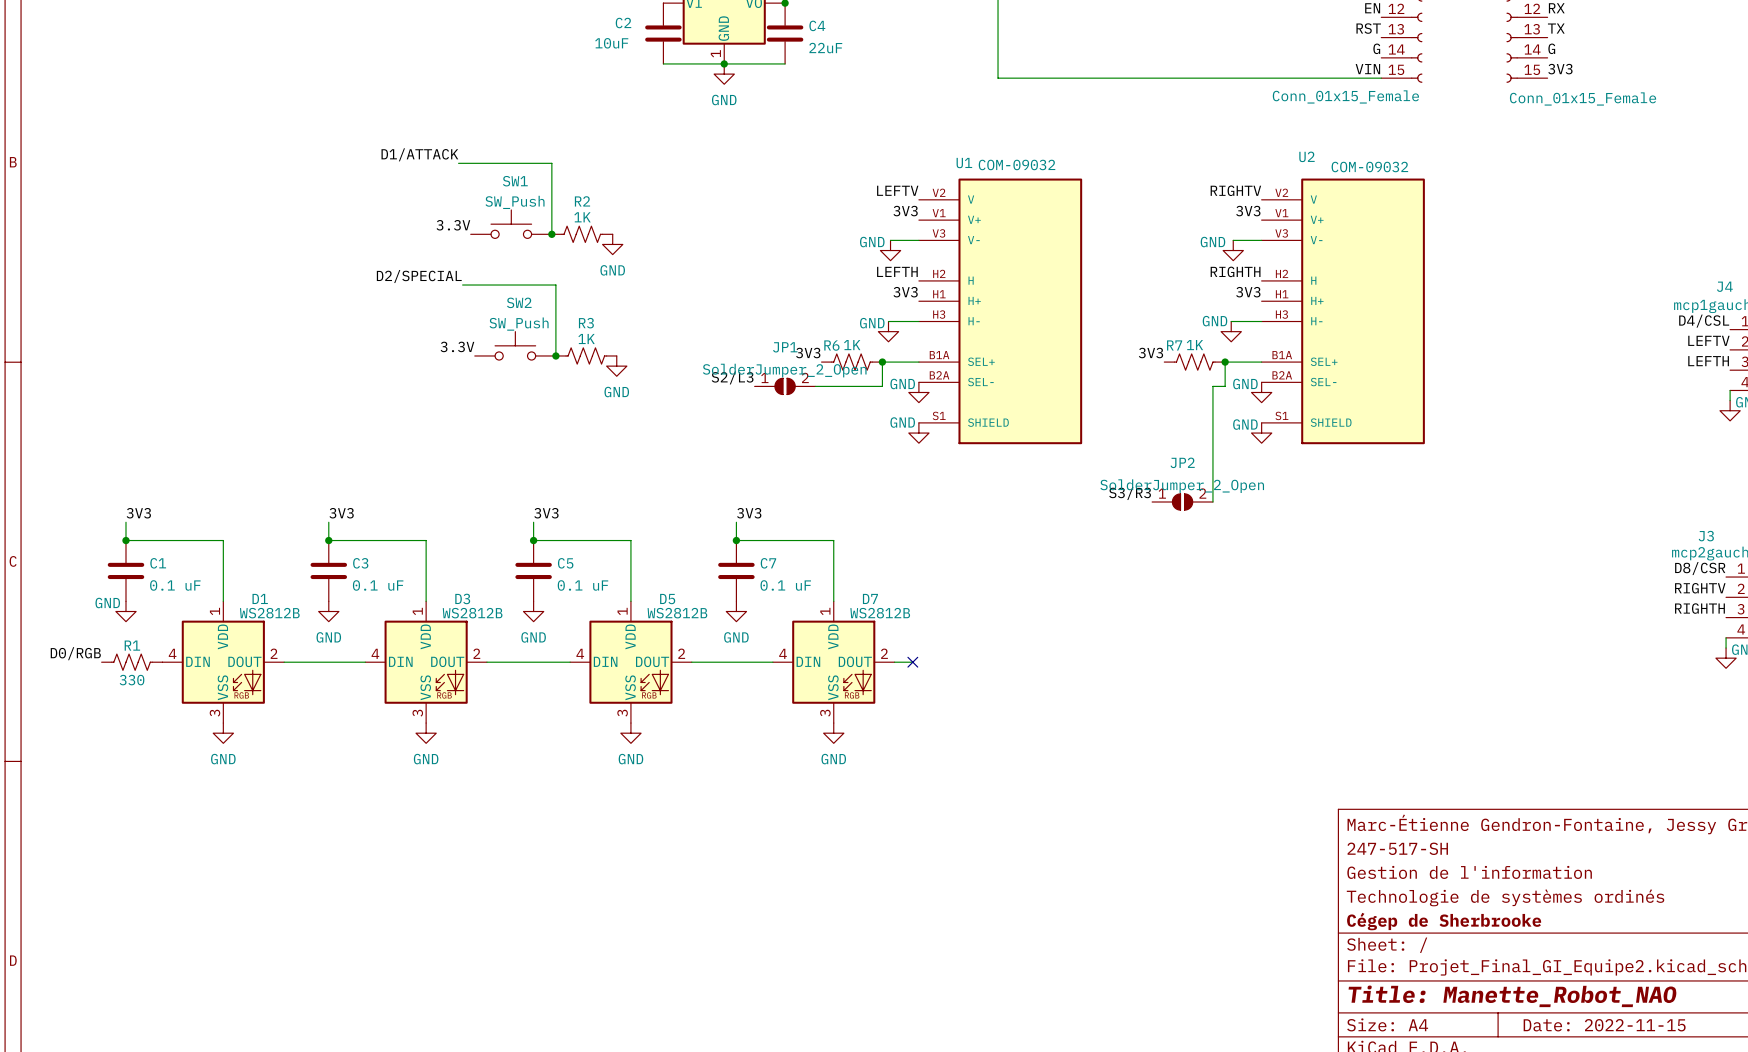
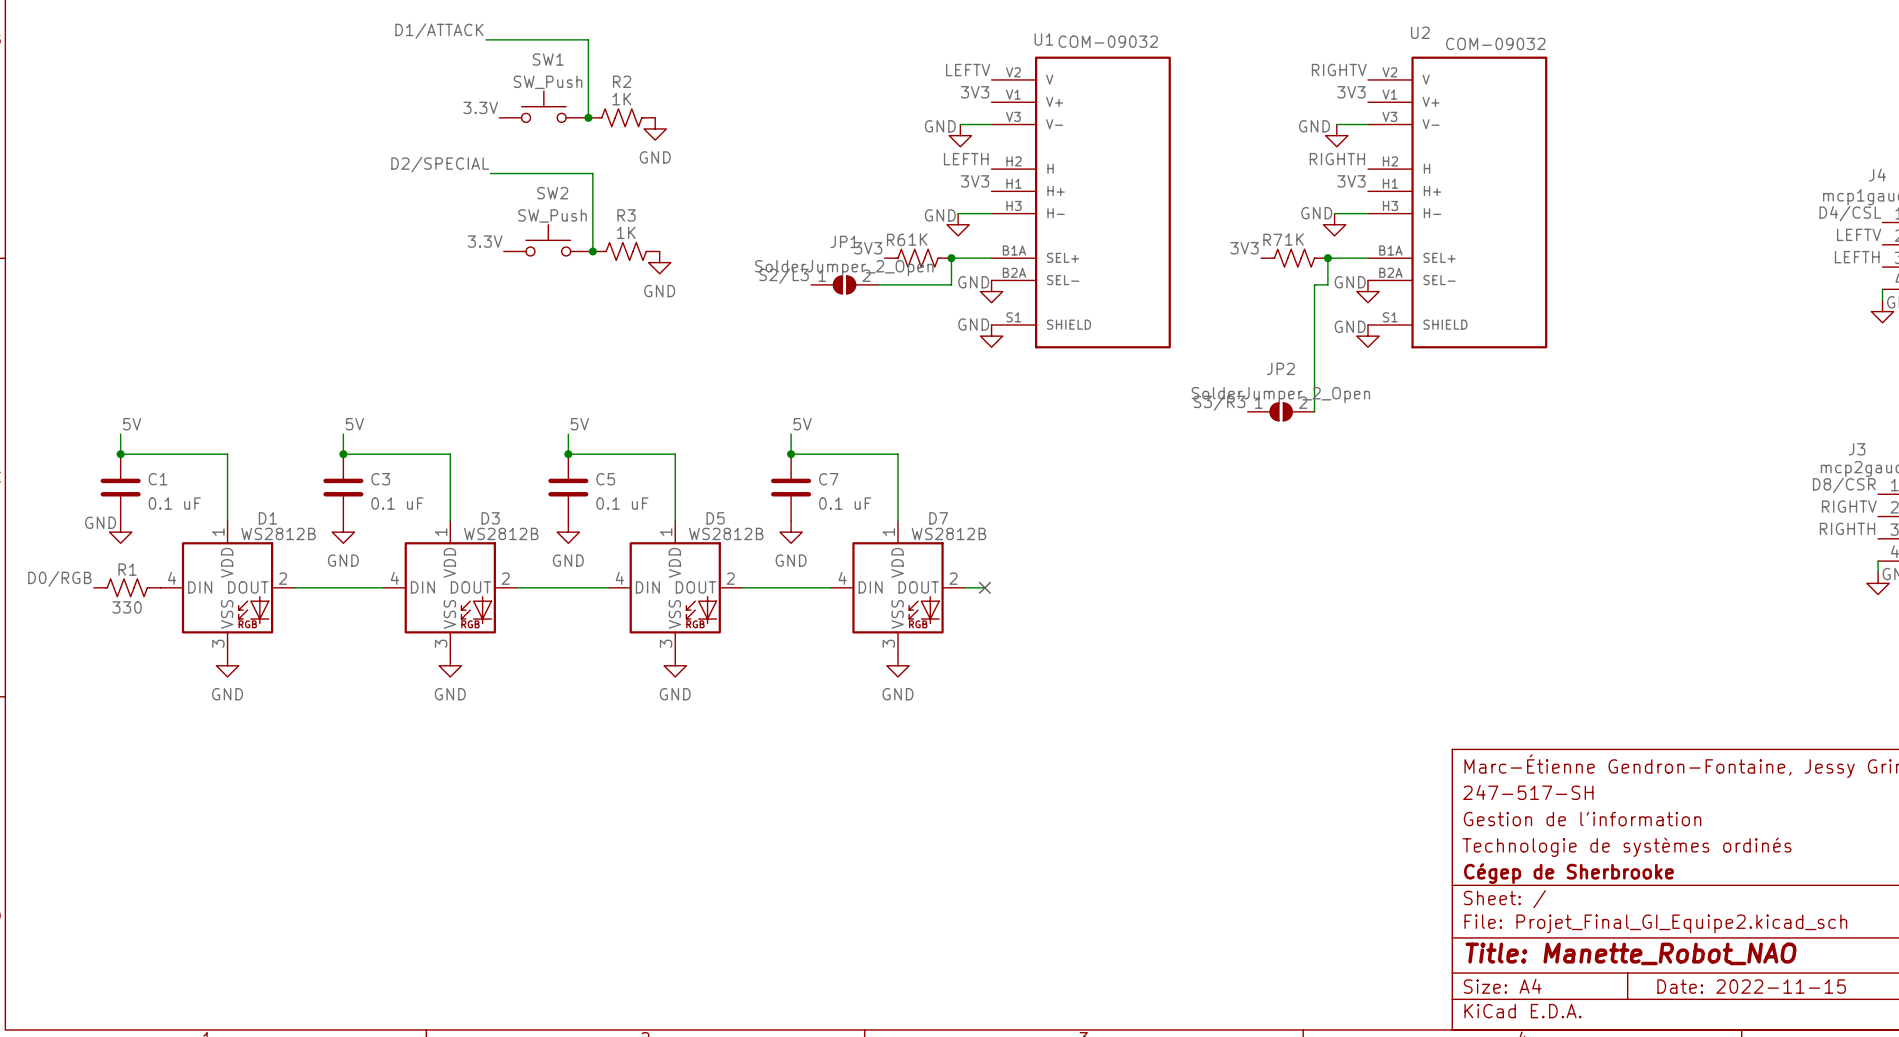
label: 3V3 (138, 513) -> 5V (132, 424)
label: 3V3 (341, 513) -> 5V (354, 424)
label: 3V3 (546, 513) -> 5V (579, 424)
label: 3V3 (749, 513) -> 5V (802, 424)

